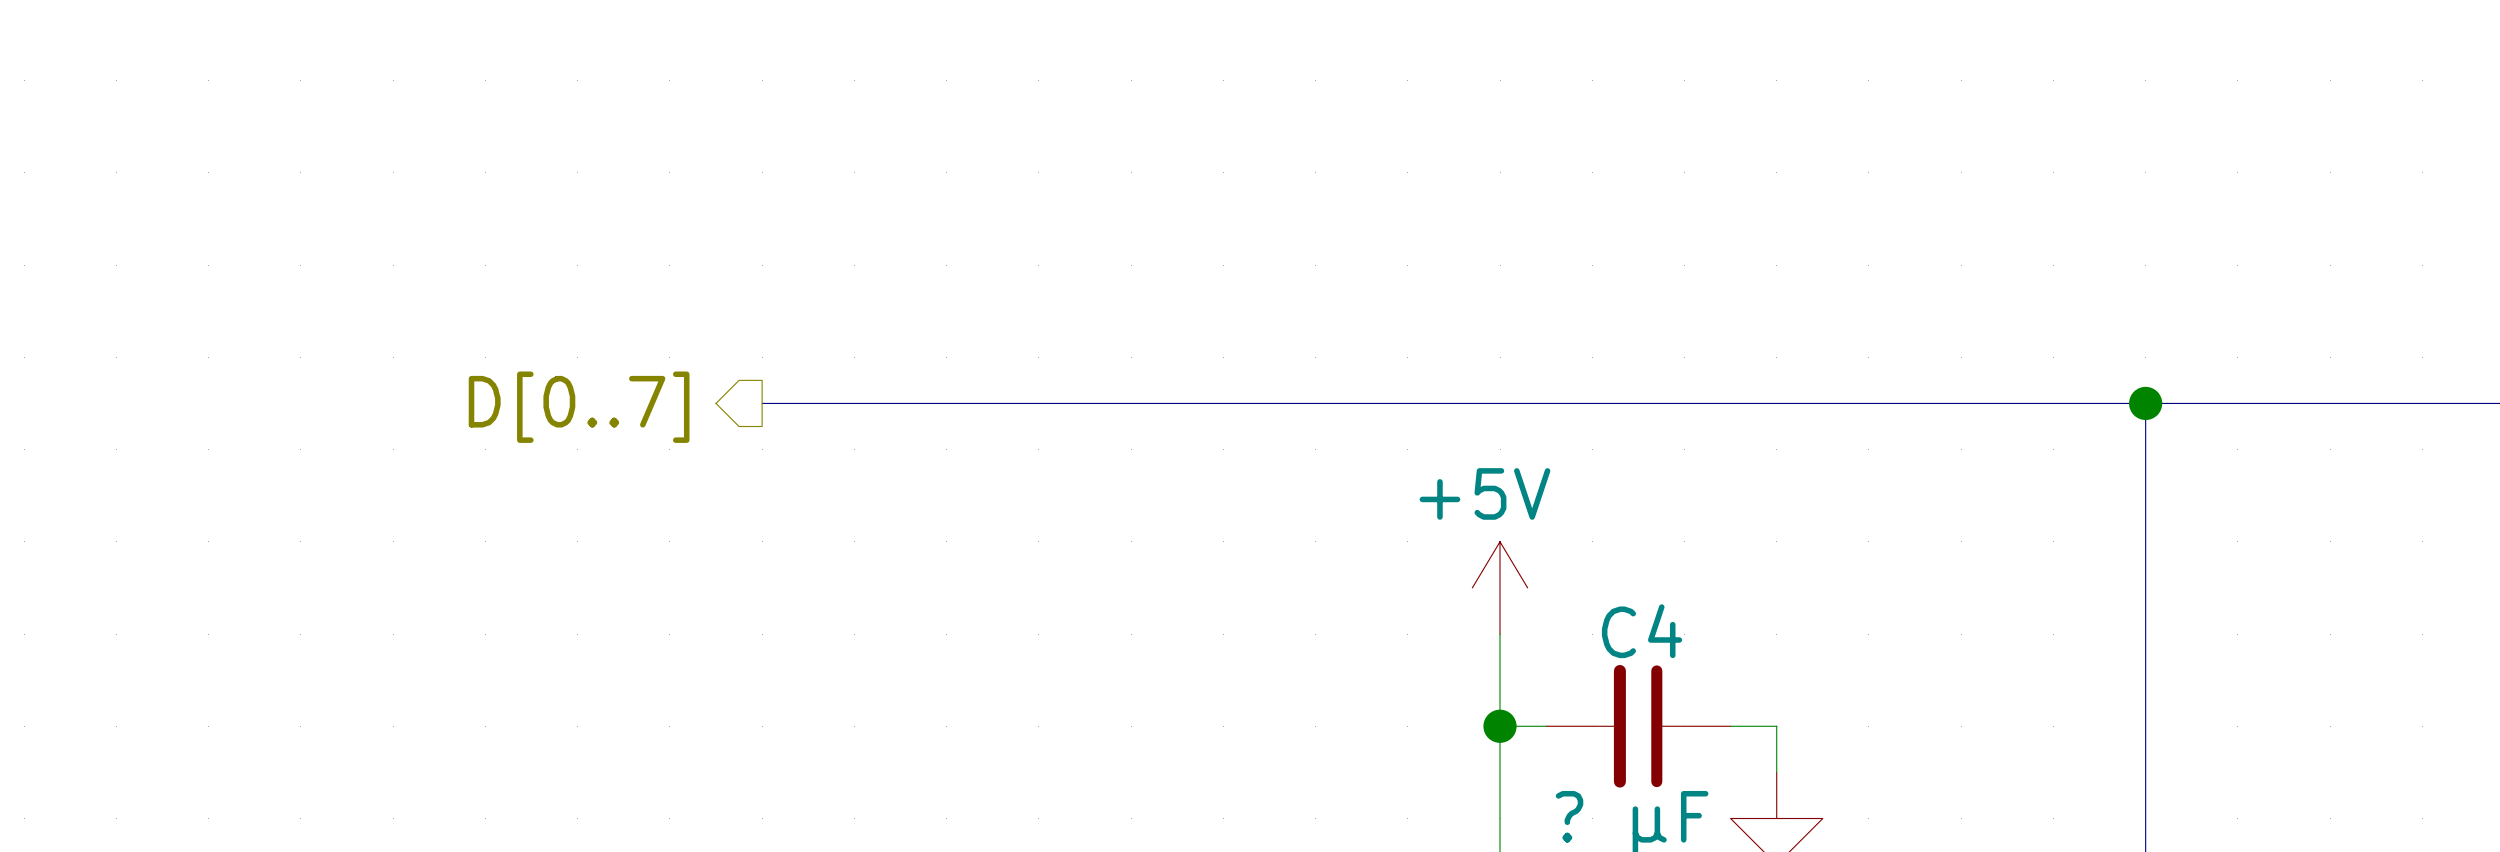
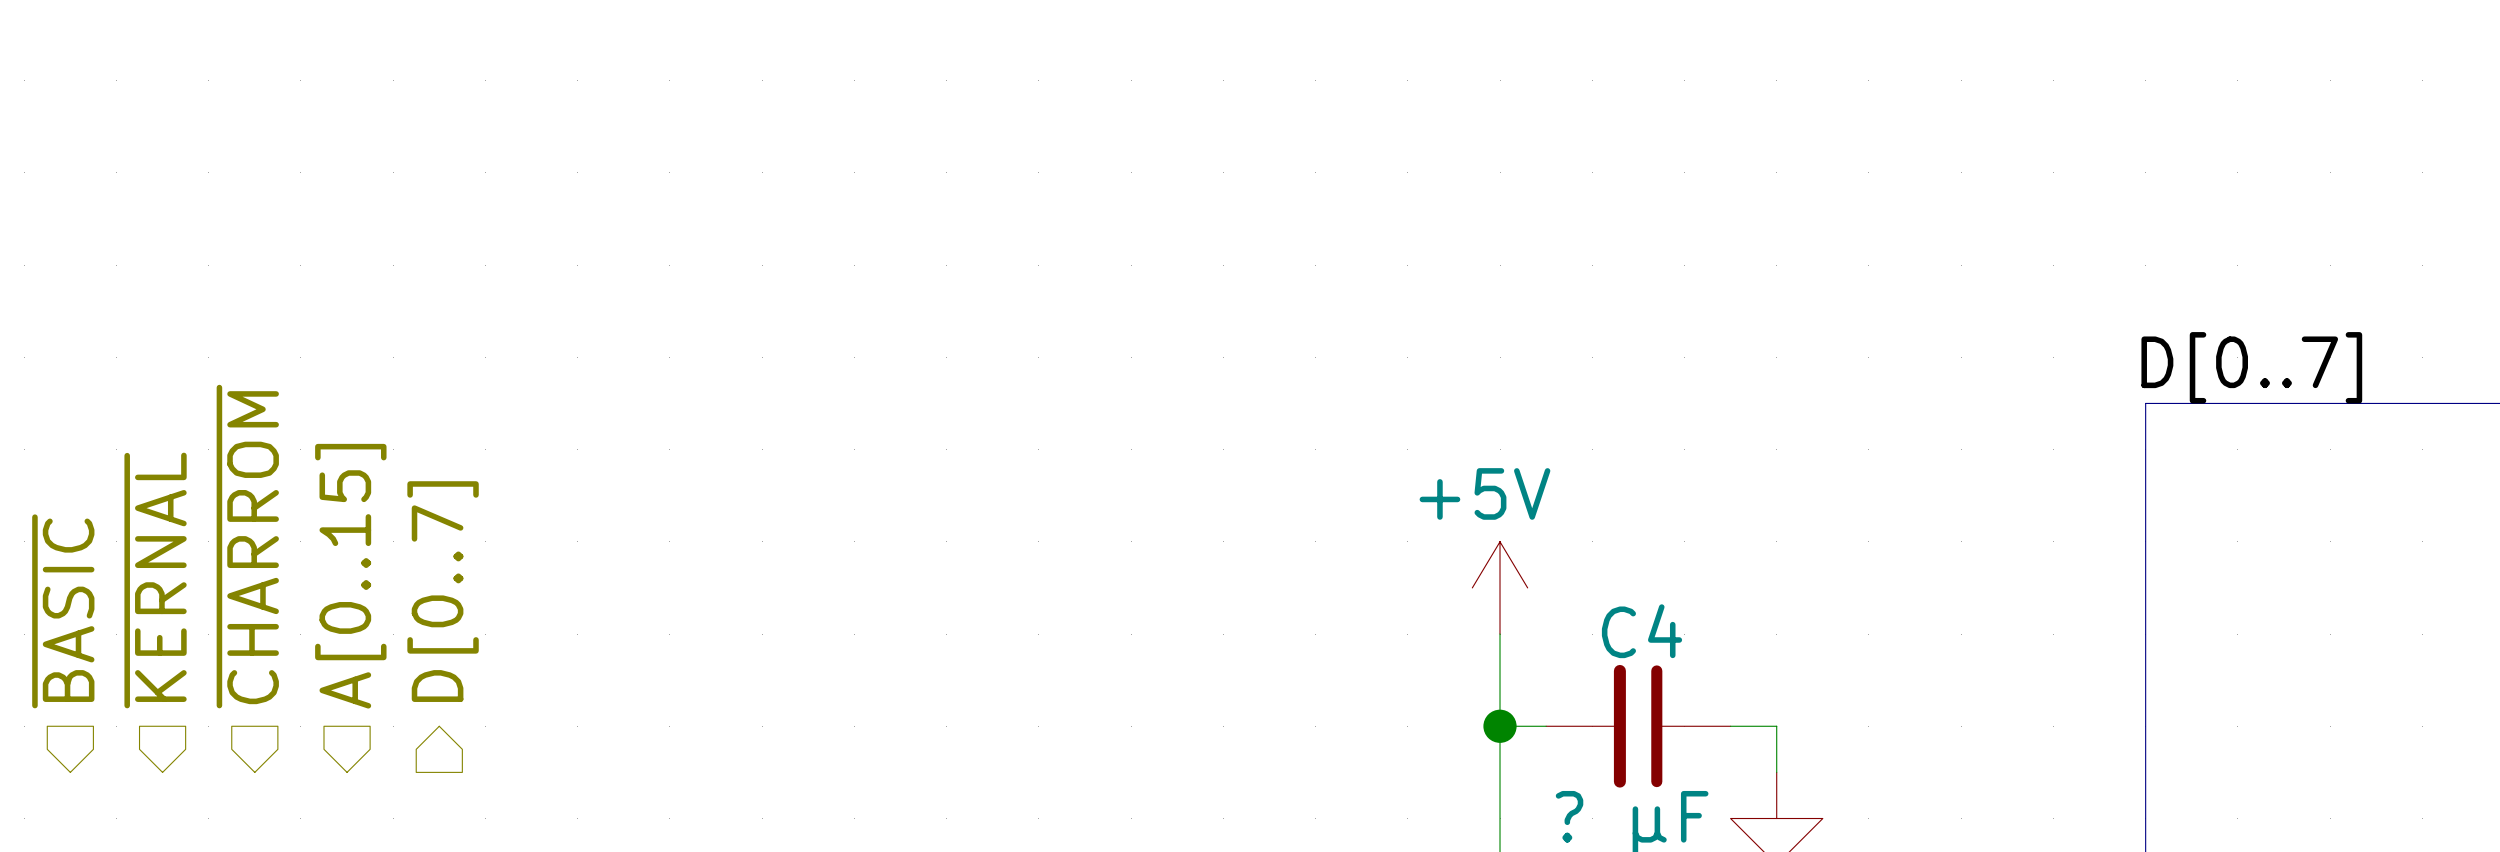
label: none -> D[0..7] (2251, 367)
bus: (762, 403) (2145, 403) -> none
junction: (2145, 403) -> none
hierarchical label rotation: 0° (579, 407) -> 90° clockwise (443, 591)
hierarchical label: none -> ~{CHARROM} (247, 546)
hierarchical label: none -> A[0..15] (350, 576)
hierarchical label: none -> ~{KERNAL} (155, 580)
hierarchical label: none -> ~{BASIC} (63, 611)

